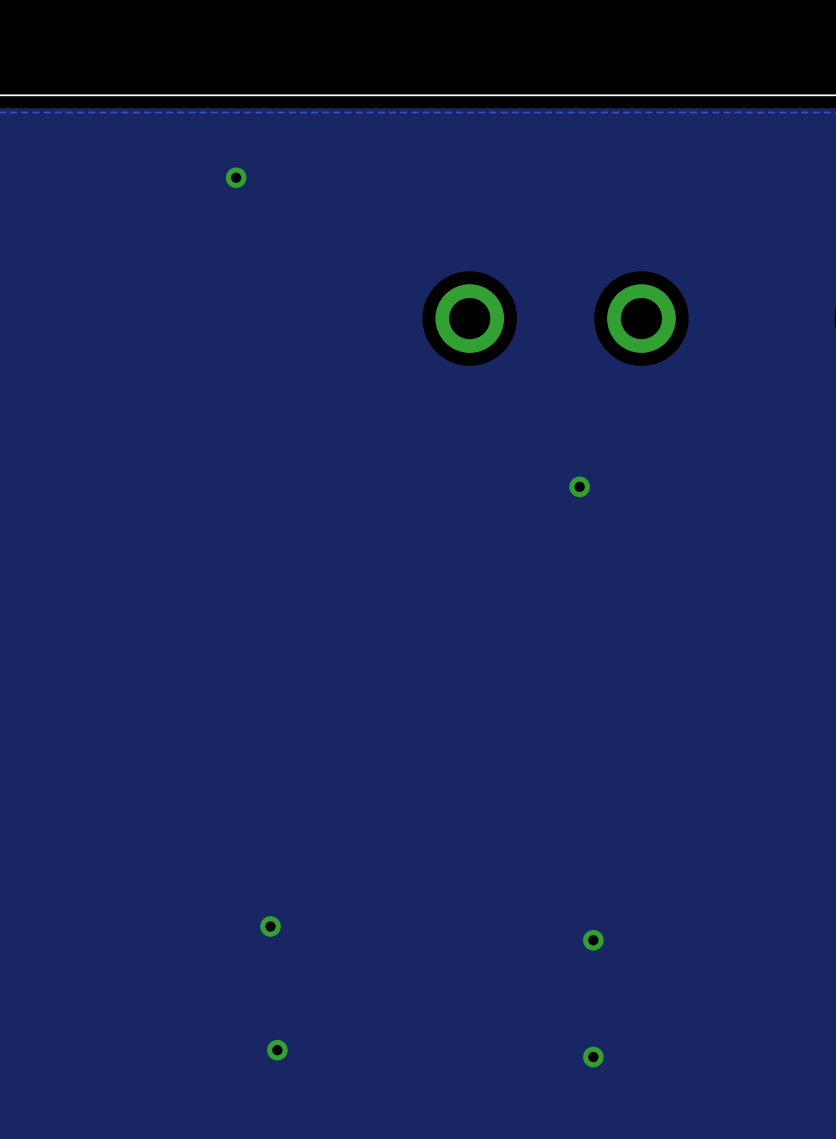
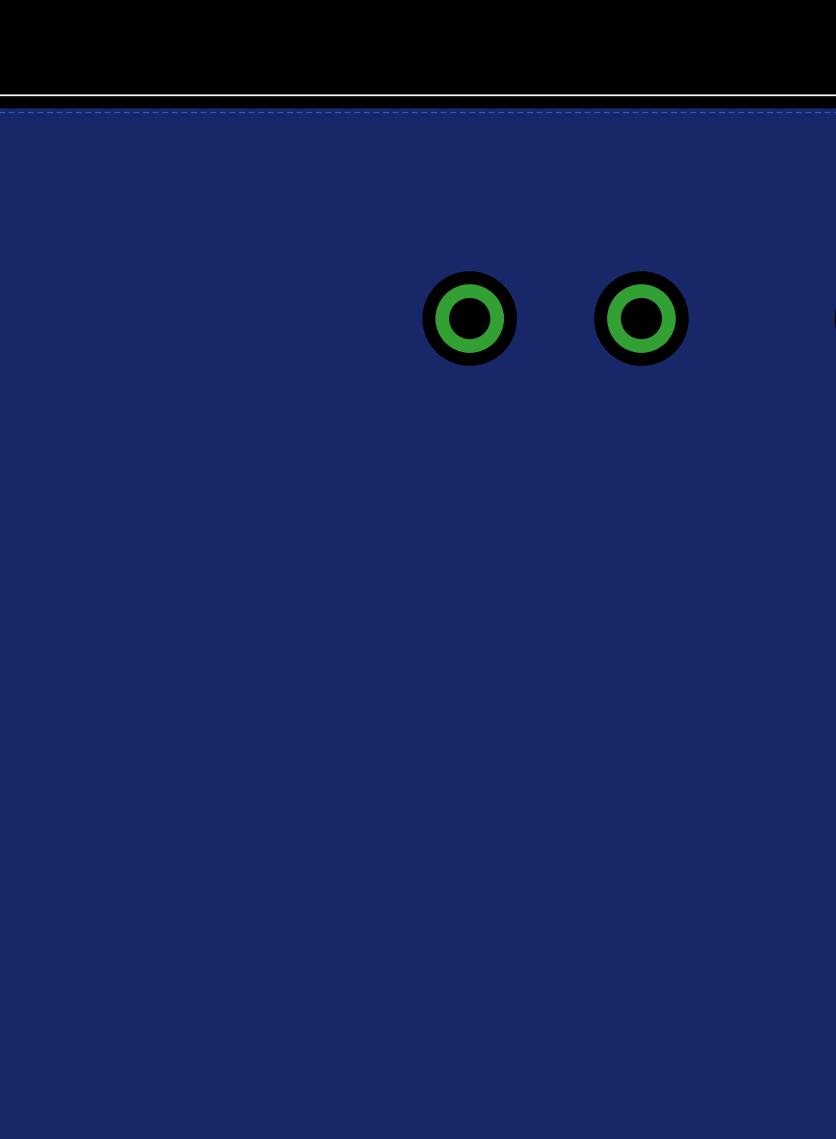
via: (236, 177) -> none
via: (579, 486) -> none
via: (270, 926) -> none
via: (593, 940) -> none
via: (277, 1050) -> none
via: (593, 1057) -> none

